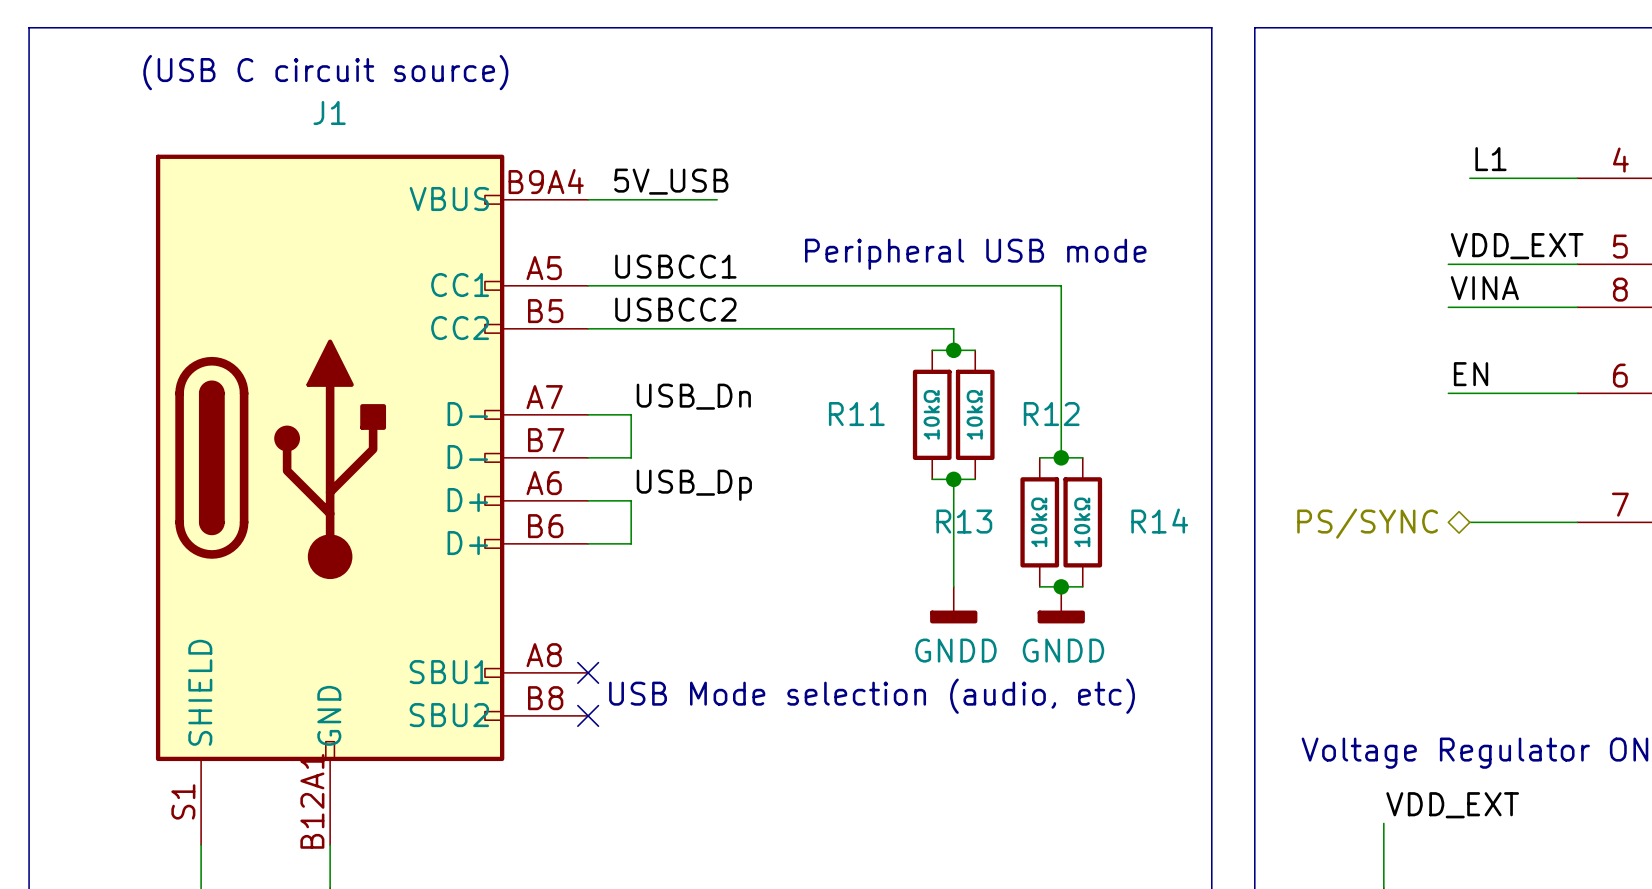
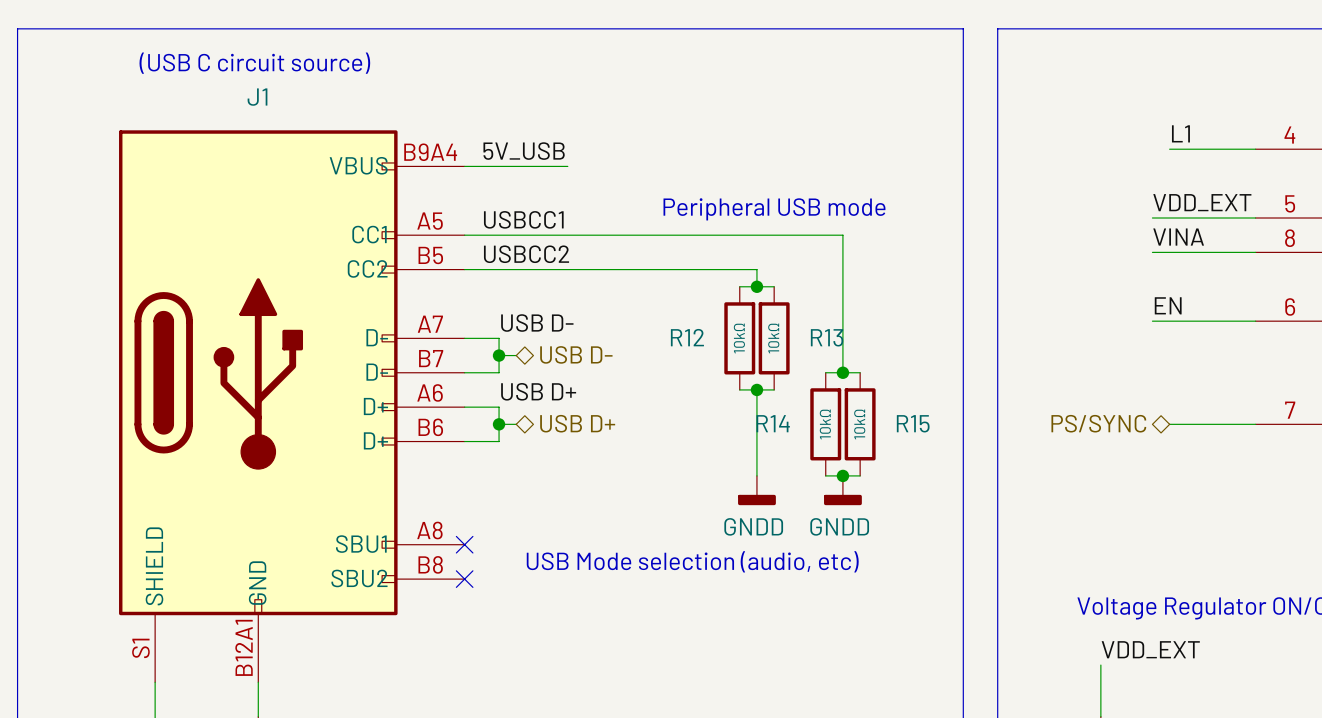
label: USB_Dn (693, 396) -> USB D- (537, 323)
R11 name: R11 (856, 414) -> R12 (687, 337)
R12 name: R12 (1051, 414) -> R13 (827, 337)
hierarchical label: none -> USB D- (576, 354)
wire: none -> (499, 355) (516, 355)
junction: none -> (499, 355)
label: USB_Dp (694, 485) -> USB D+ (538, 391)
hierarchical label: none -> USB D+ (577, 423)
R13 name: R13 (964, 521) -> R14 (773, 423)
R14 name: R14 (1159, 521) -> R15 (913, 423)
wire: none -> (499, 424) (516, 424)
junction: none -> (499, 424)

